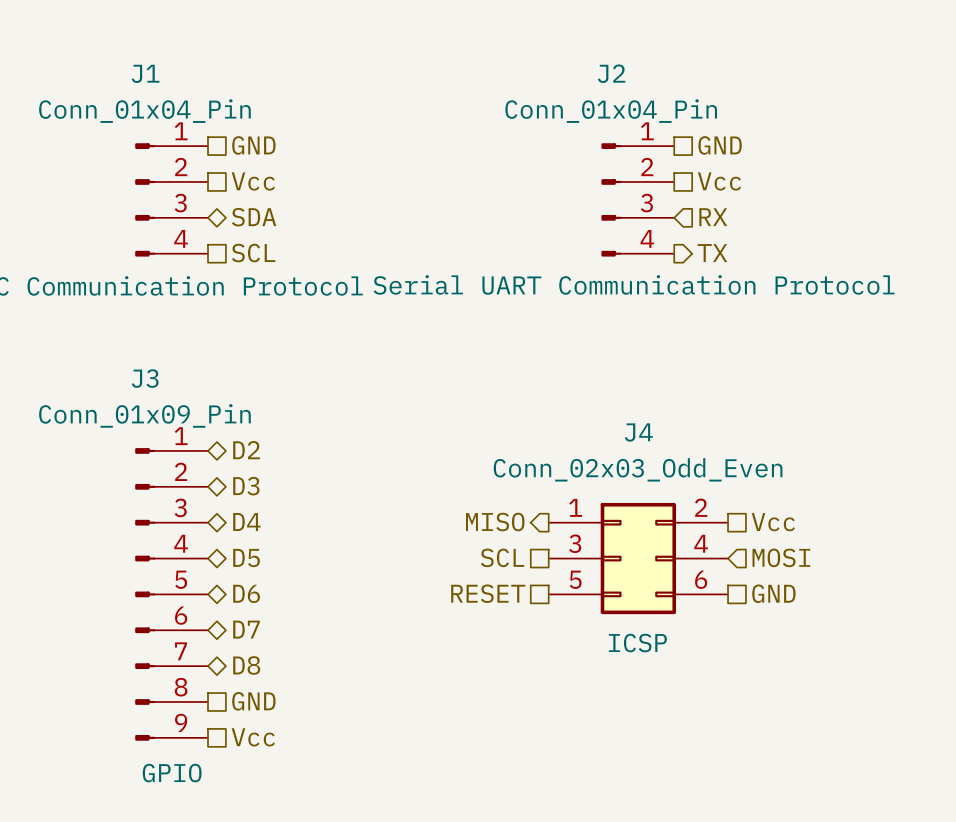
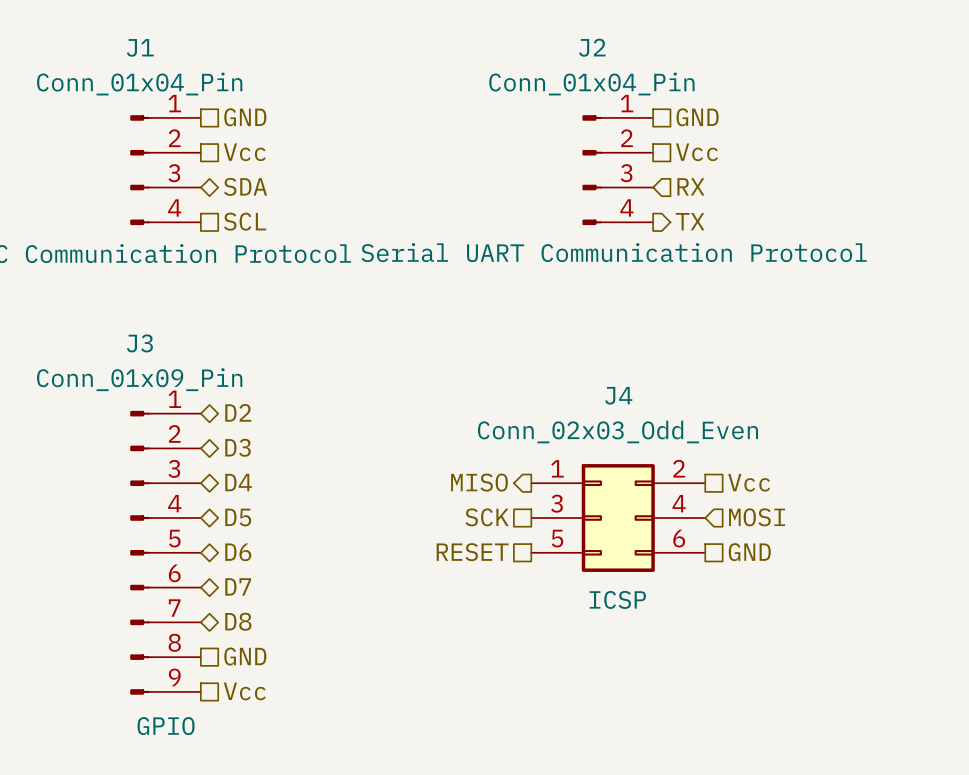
hierarchical label: SCL (502, 557) -> SCK (487, 517)

